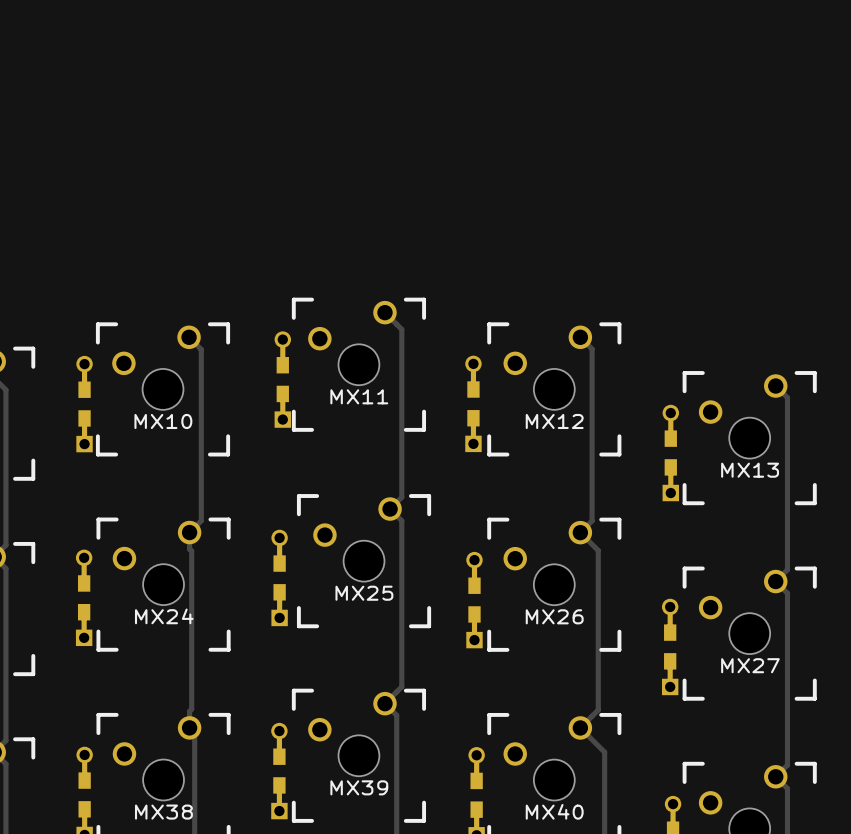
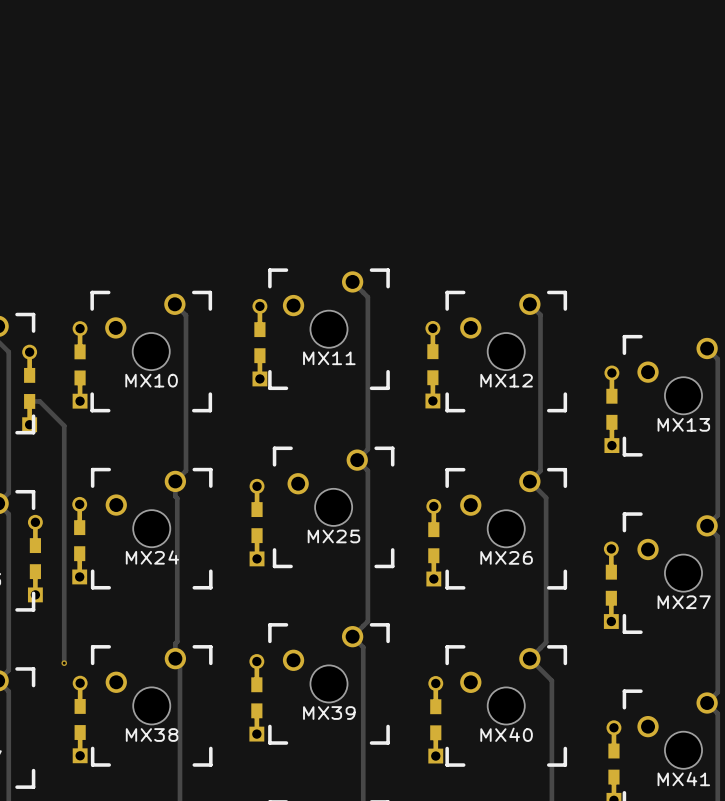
part: none -> (29, 388)
track: none -> (29, 401) (39, 401) (64, 425) (64, 663)
part: none -> (35, 558)
via: none -> (64, 663)

